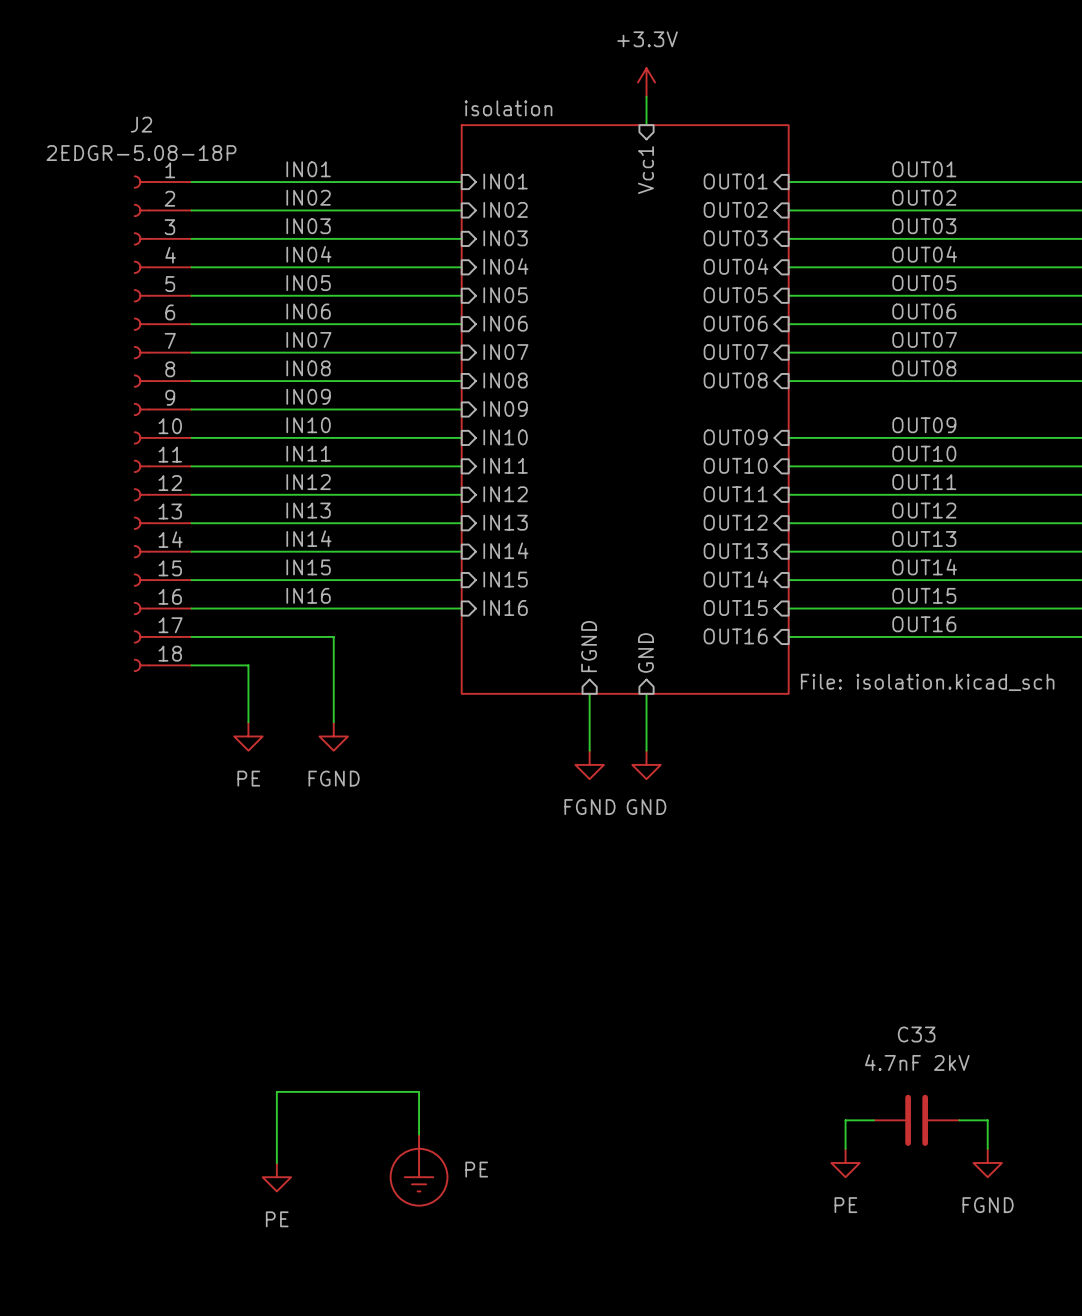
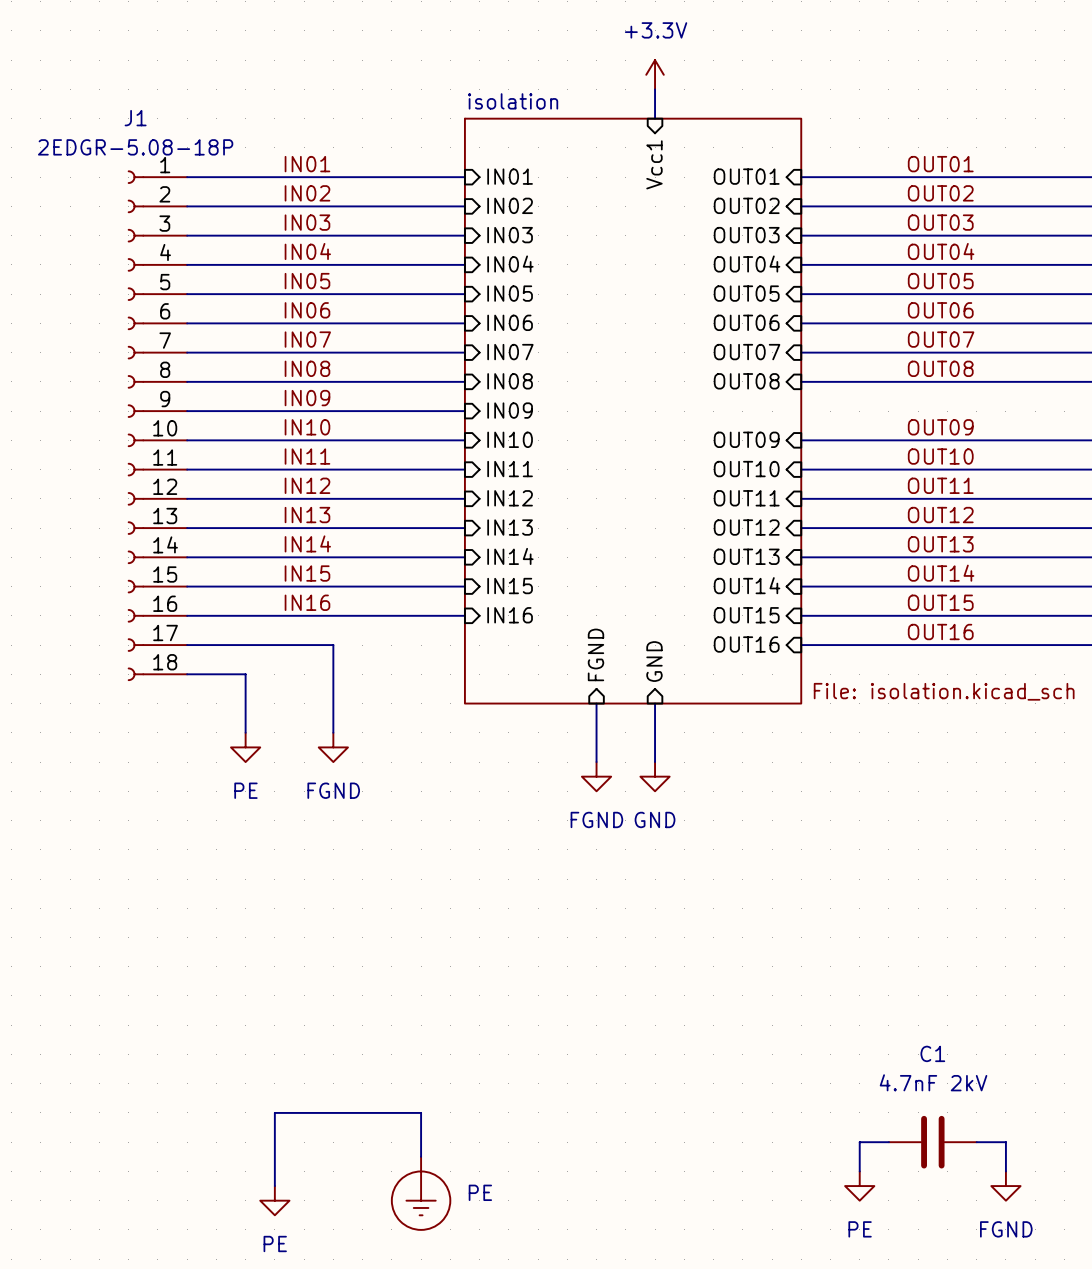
J2 name: J2 (141, 124) -> J1 (135, 118)
C33 name: C33 (916, 1034) -> C1 (932, 1053)

